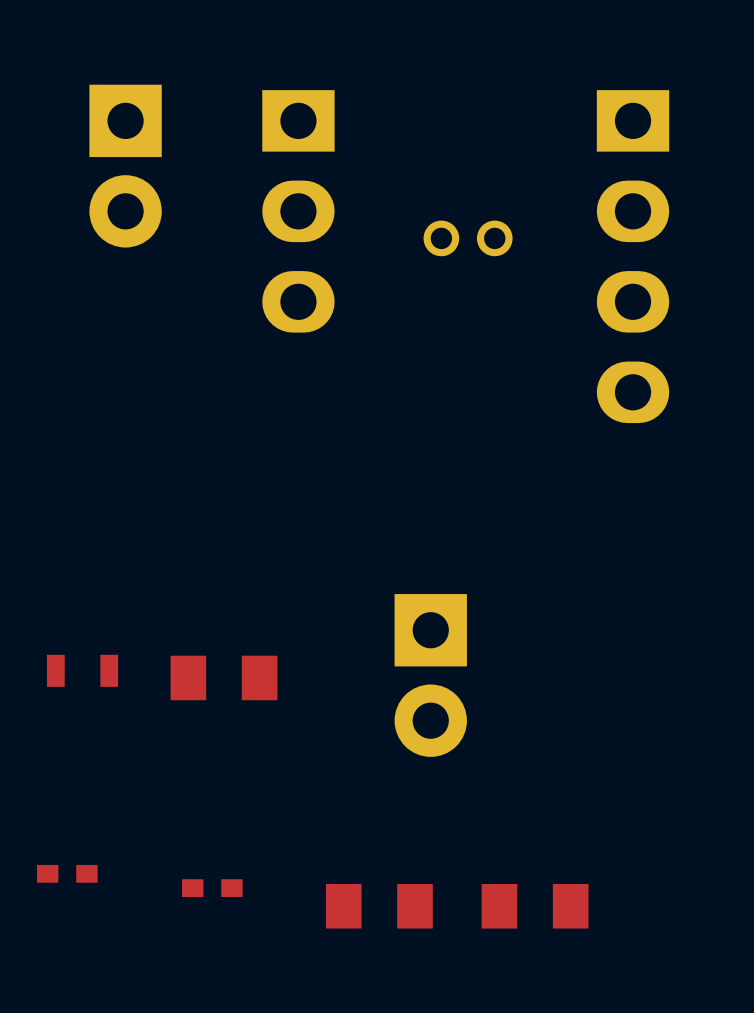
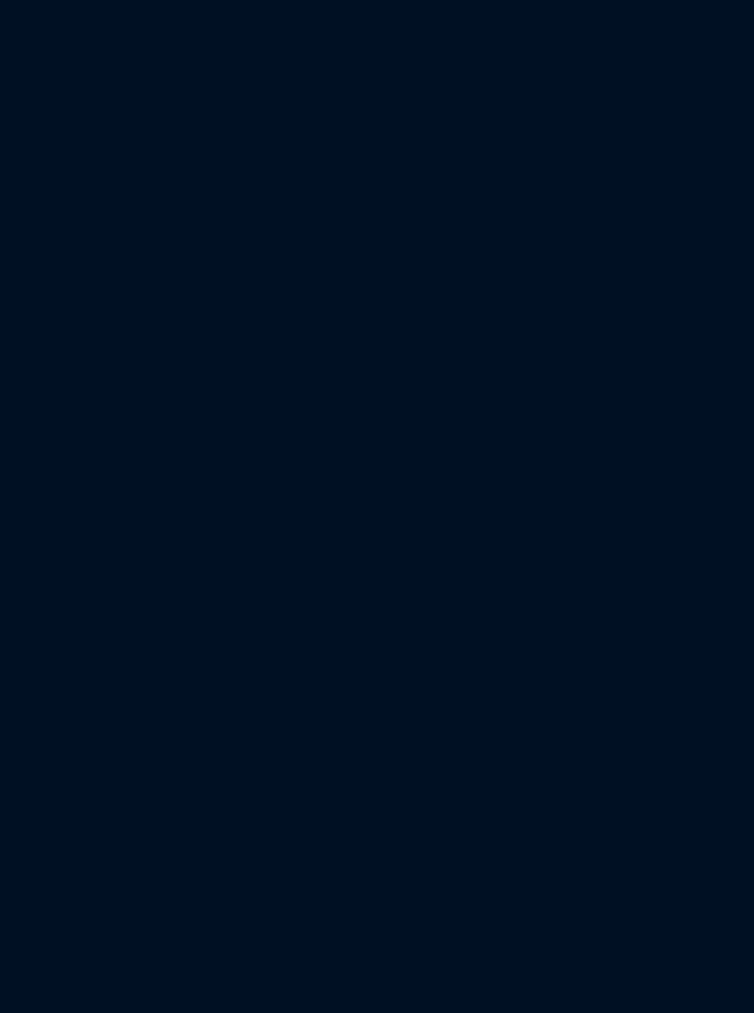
part: (125, 166) -> none
part: (298, 211) -> none
part: (468, 238) -> none
part: (633, 256) -> none
part: (82, 670) -> none
part: (430, 675) -> none
part: (224, 677) -> none
part: (67, 873) -> none
part: (212, 888) -> none
part: (379, 906) -> none
part: (535, 906) -> none

